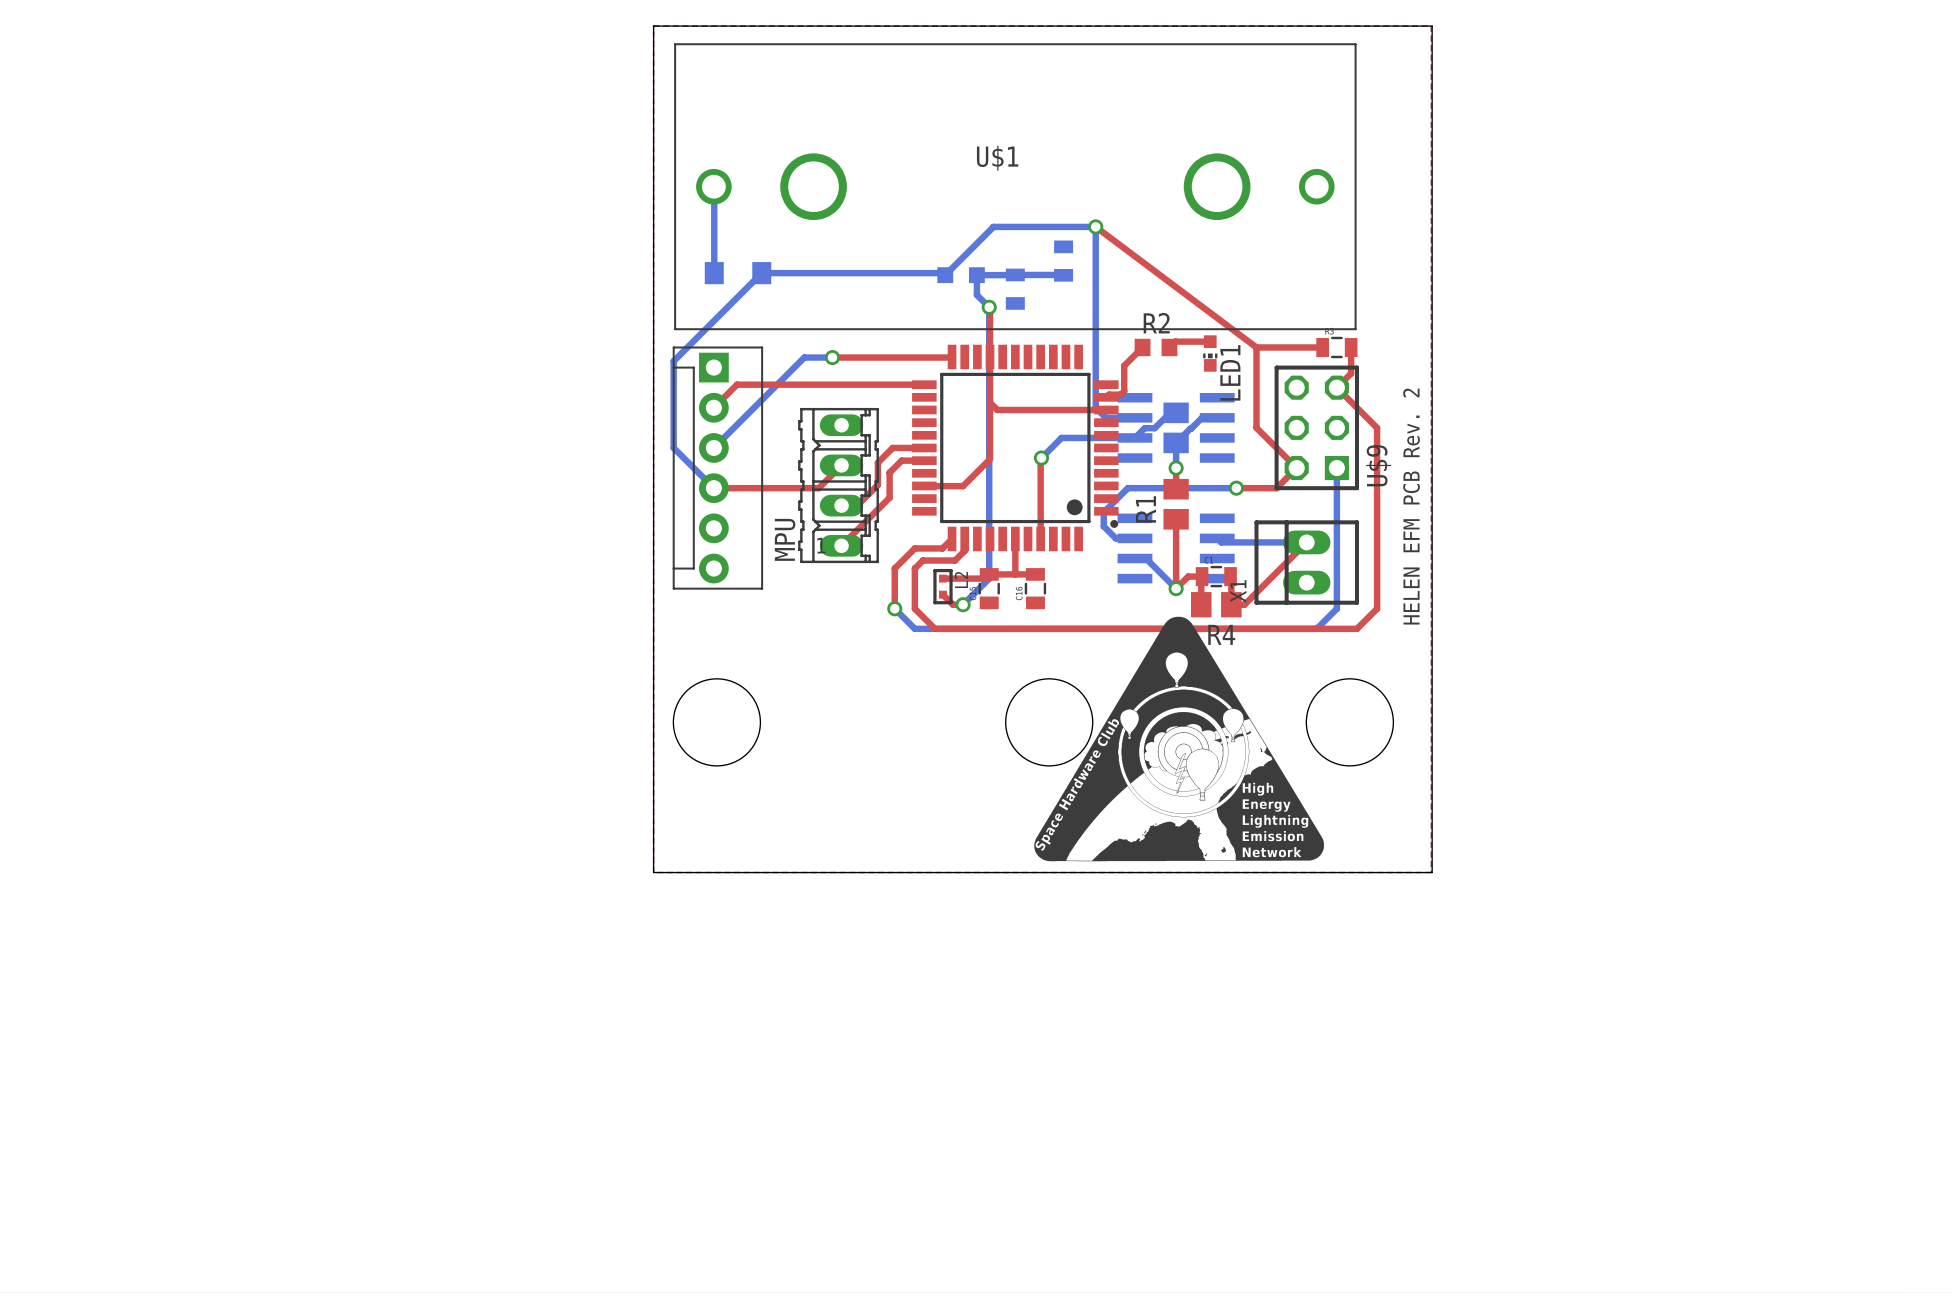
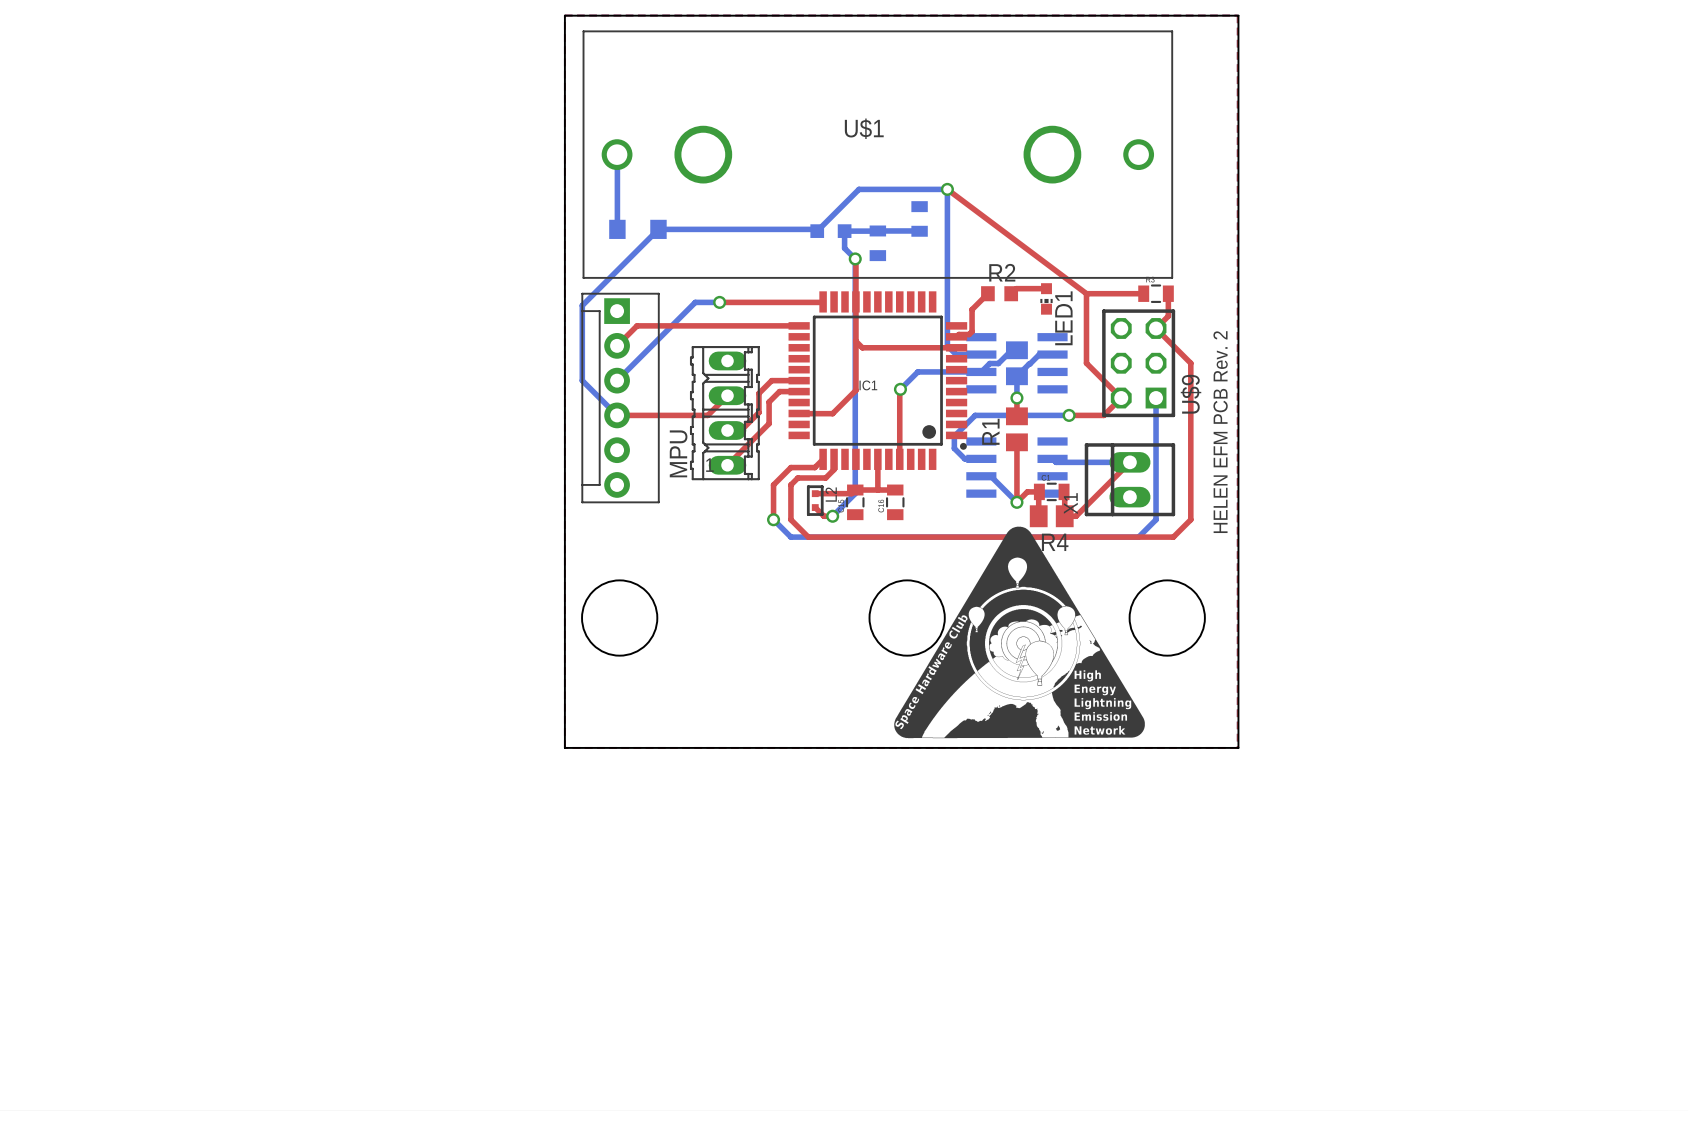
IC1 name: none -> IC1 (868, 385)

